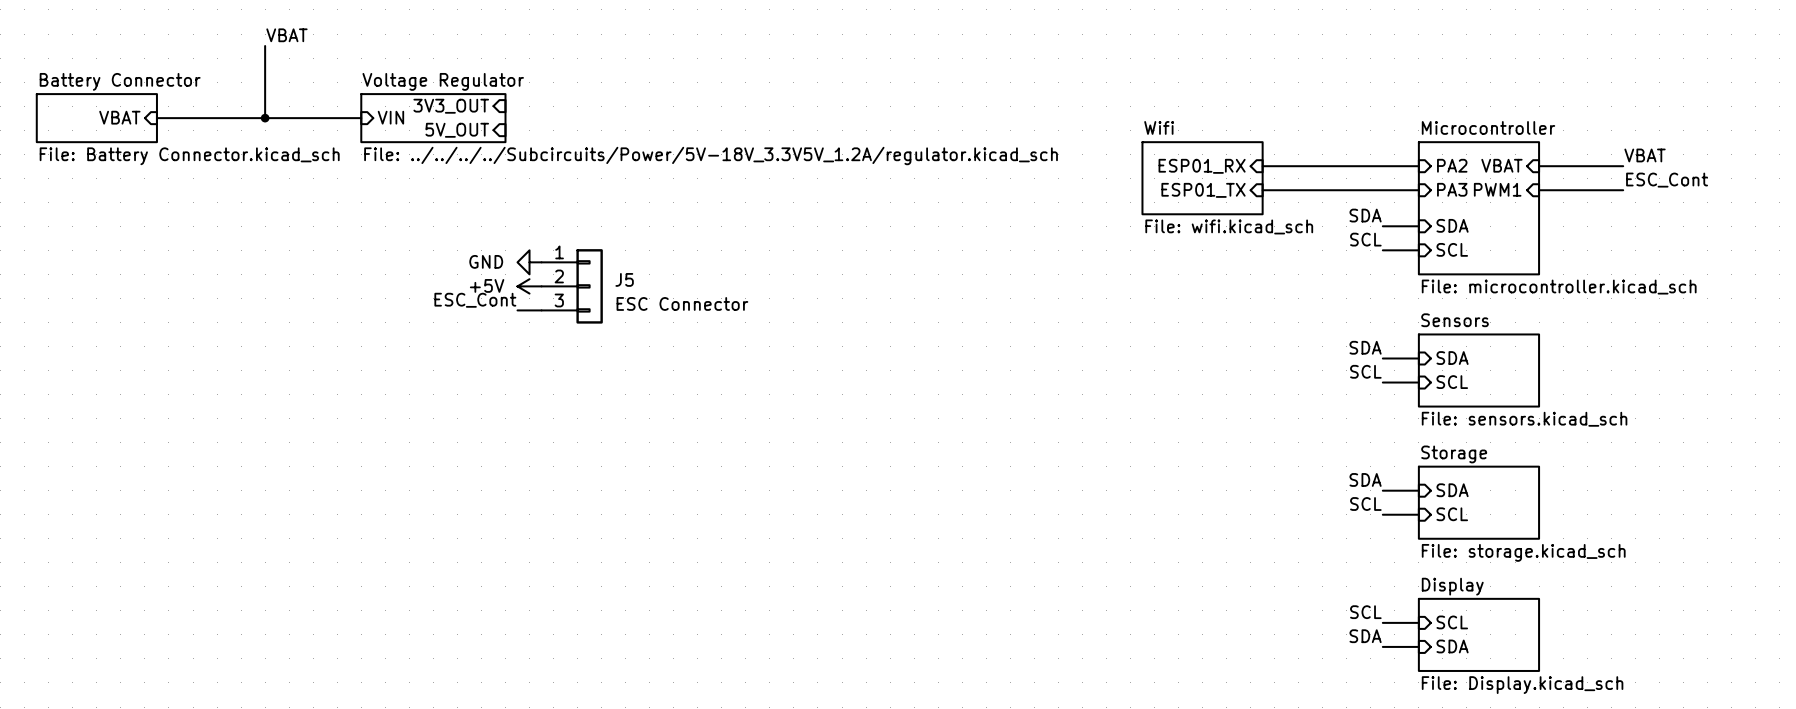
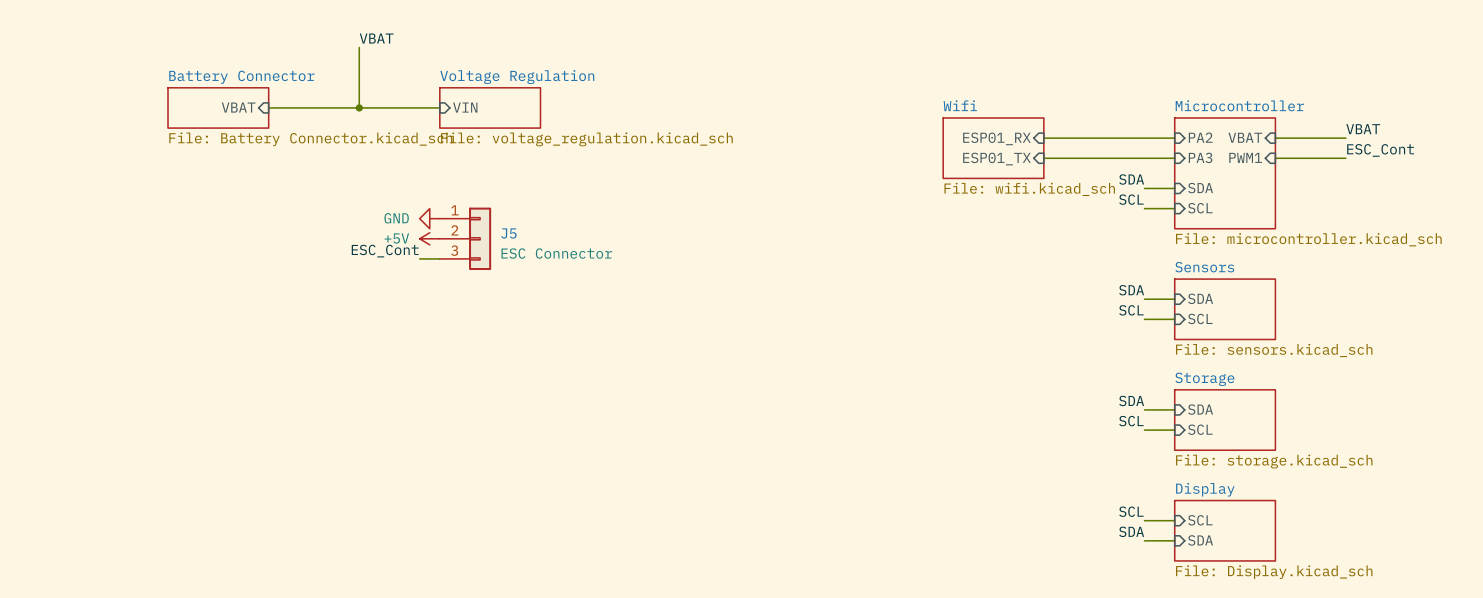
label position: VBAT (286, 35) -> VBAT (376, 38)
wire: (265, 46) (265, 118) -> (359, 47) (359, 107)
sheet pin: 3V3_OUT (451, 106) -> none
sheet pin position: VBAT (119, 117) -> VBAT (238, 107)
sheet pin position: VIN (390, 117) -> VIN (465, 107)
sheet Battery Connector position: (96, 118) -> (218, 107)
wire: (156, 118) (361, 118) -> (268, 107) (439, 107)
junction: (265, 118) -> none
sheet Voltage Regulator: File: ../../../../Subcircuits/Power/5V-18V_3.3V5V_1.2A/regulator.kicad_sch (433, 118) -> none
junction: none -> (359, 107)
sheet pin: 5V_OUT (457, 130) -> none
sheet Voltage Regulation: none -> File: voltage_regulation.kicad_sch (490, 107)

